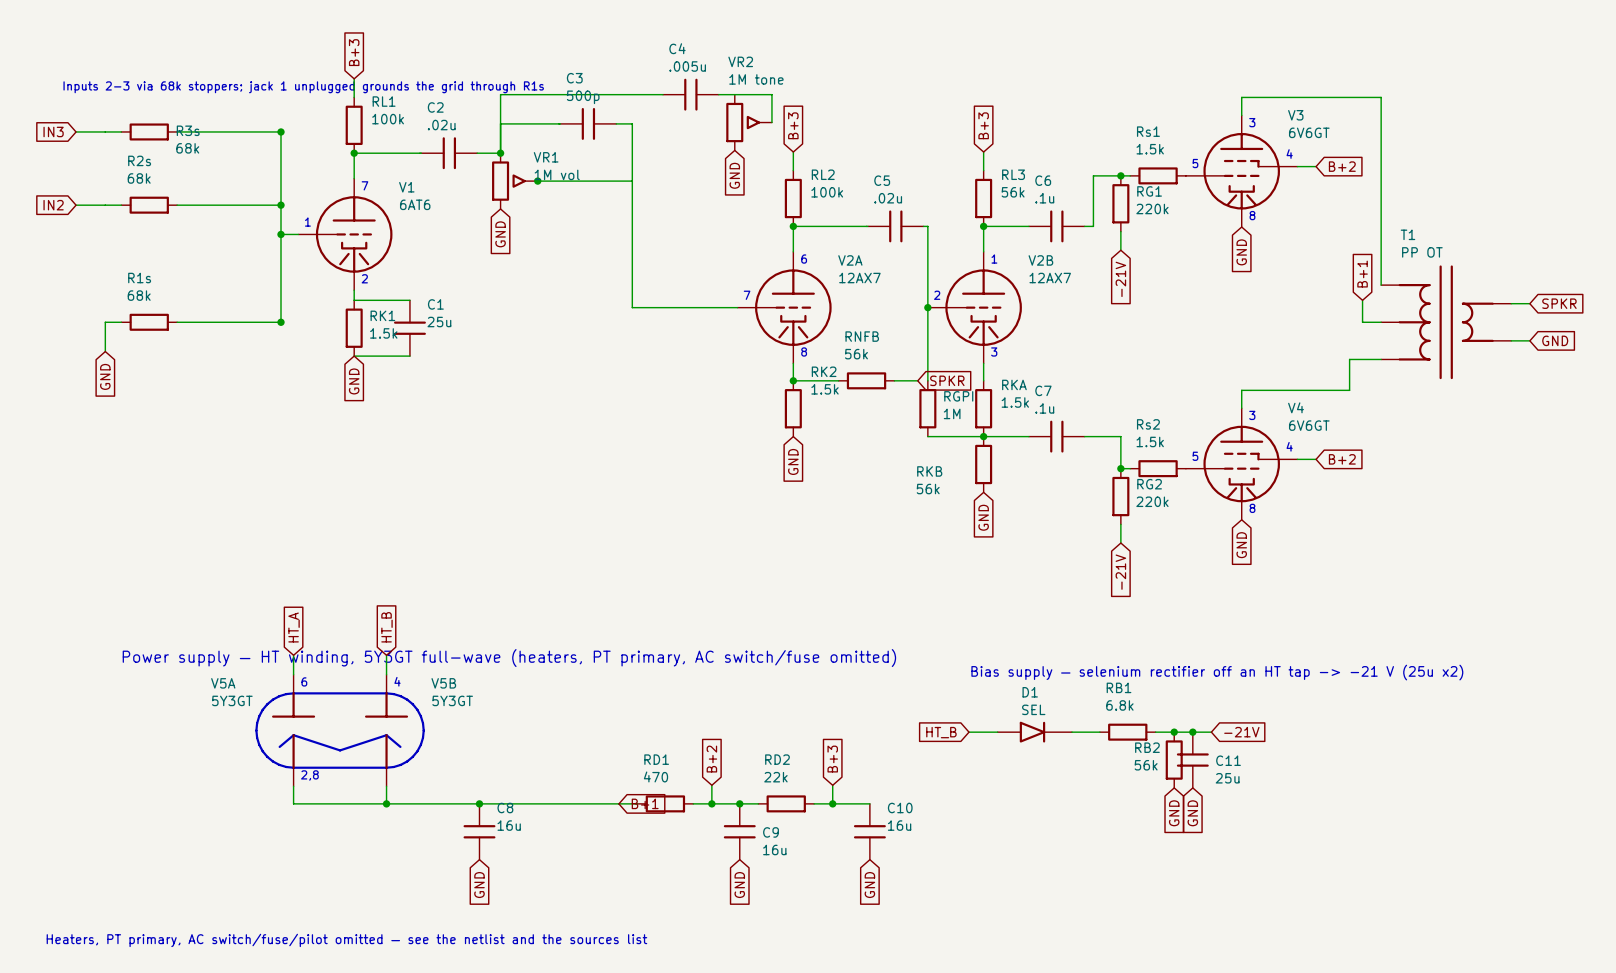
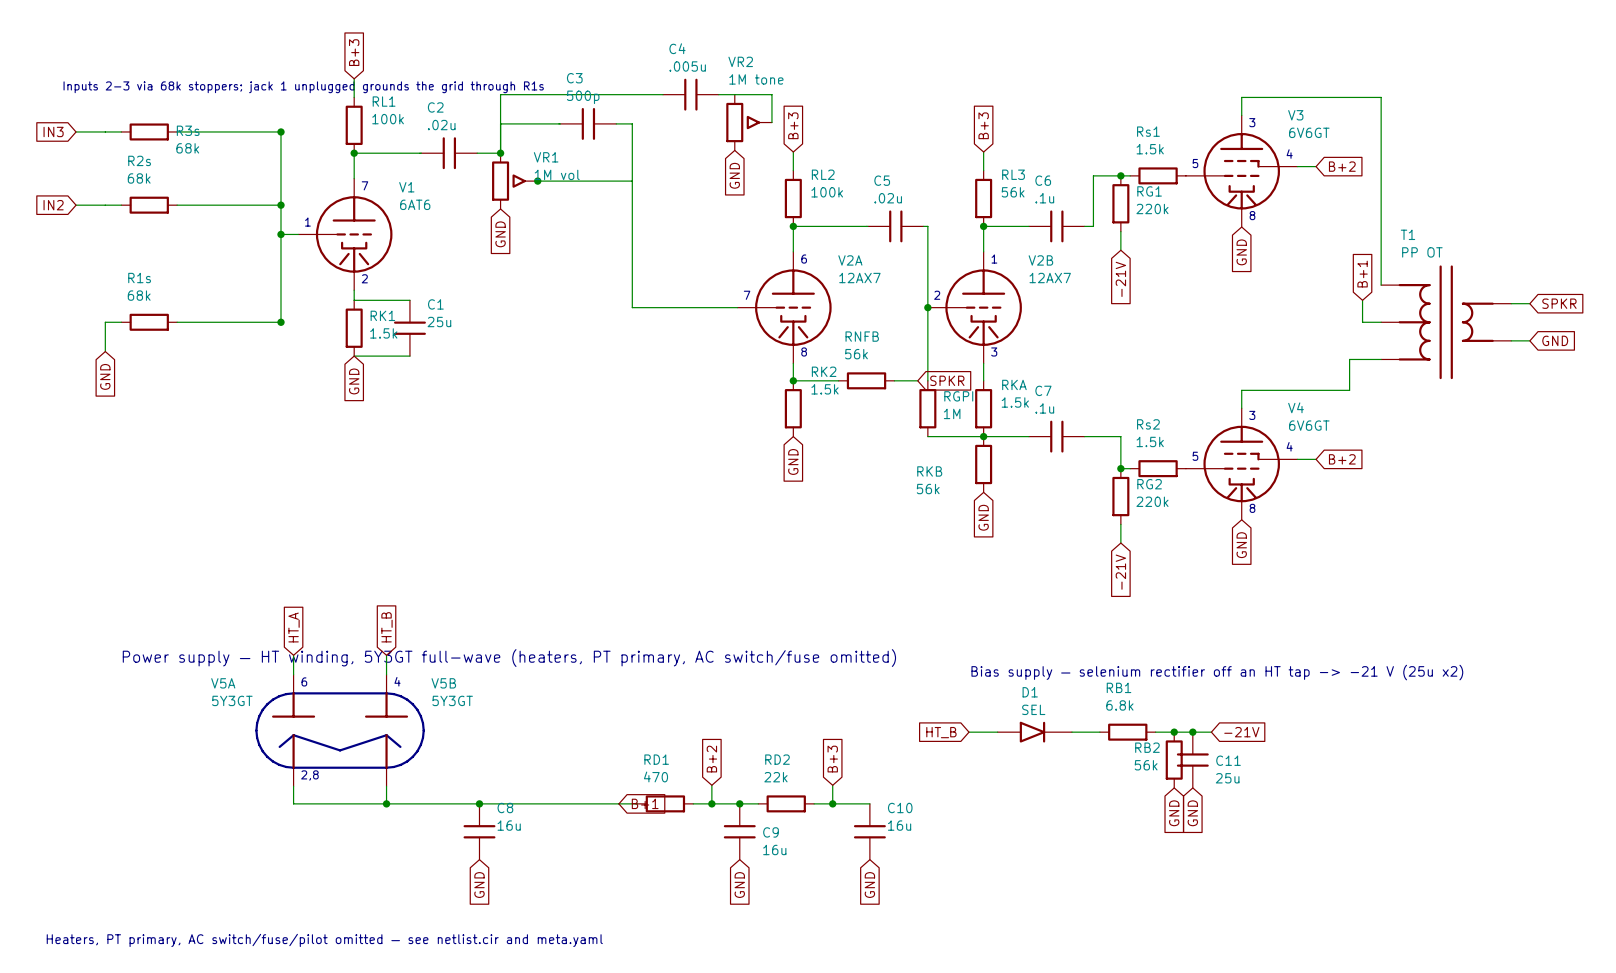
text: Heaters, PT primary, AC switch/fuse/pilot omitted — see the netlist and the sources list (346, 940) -> Heaters, PT primary, AC switch/fuse/pilot omitted — see netlist.cir and meta.yaml (324, 940)

